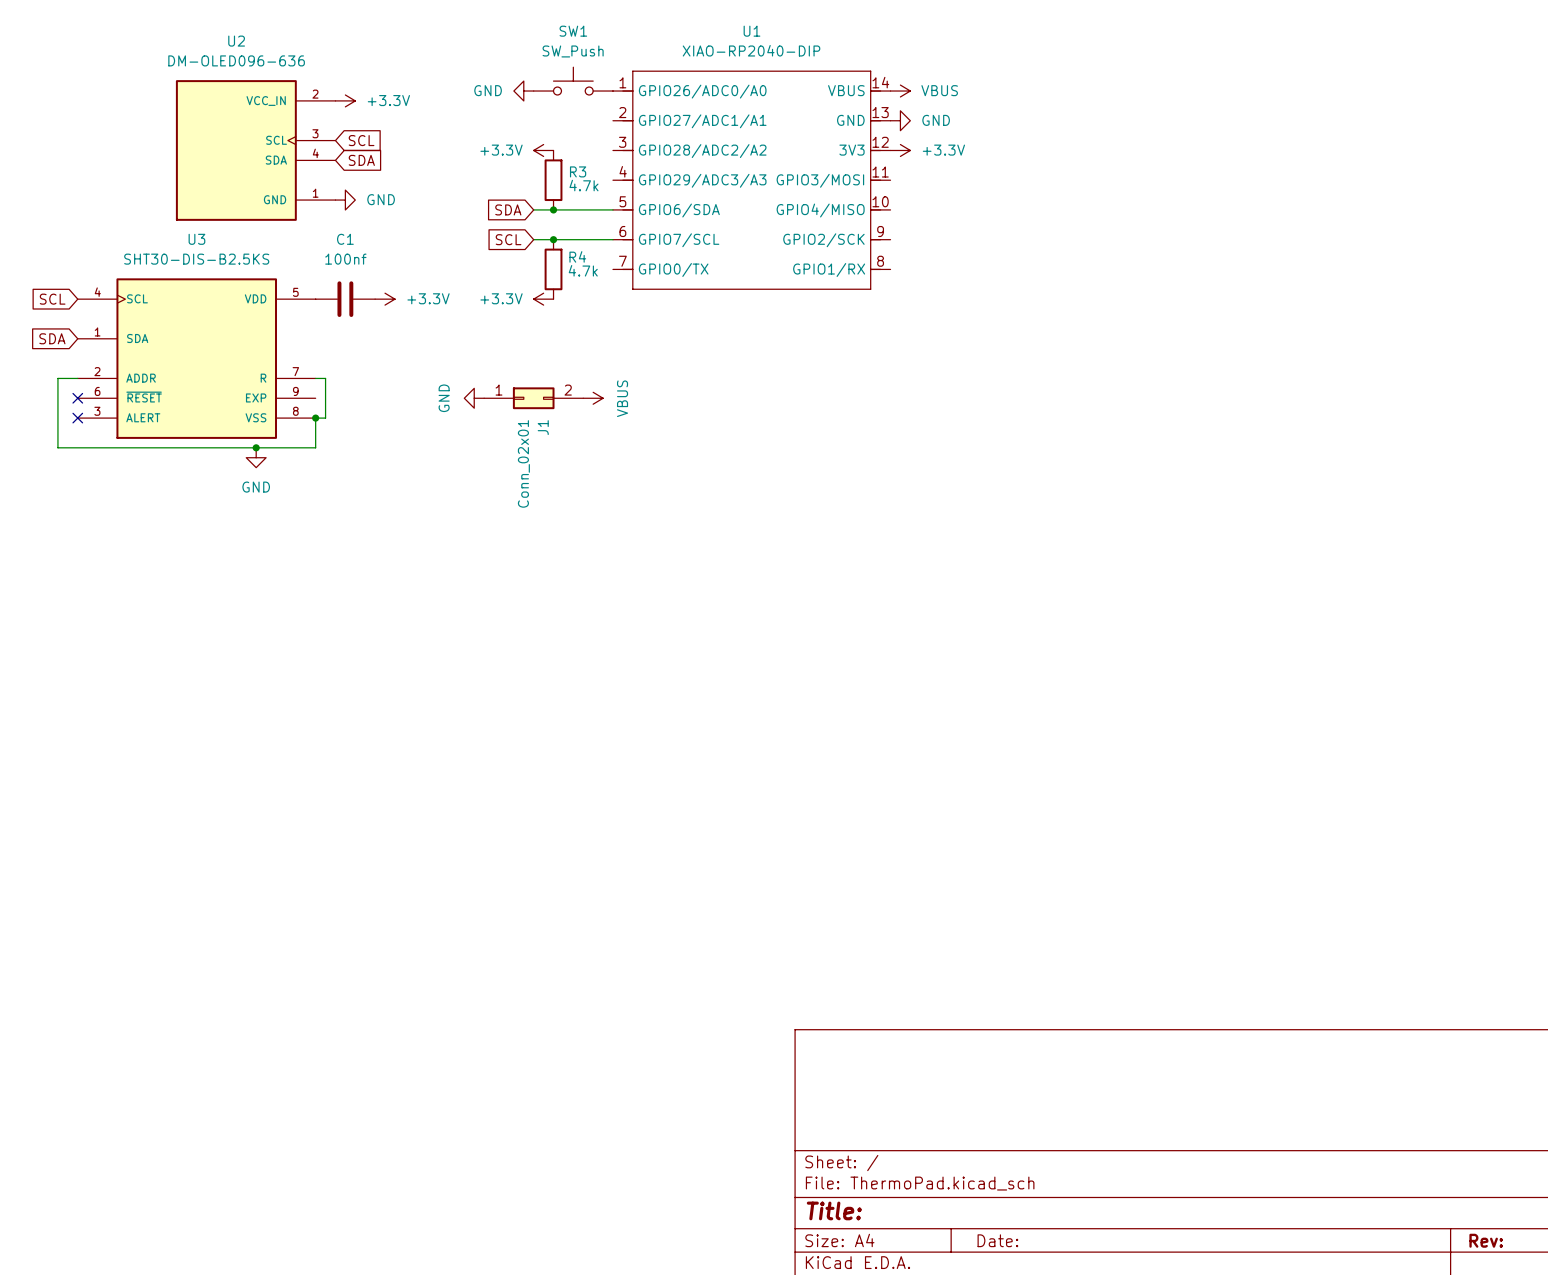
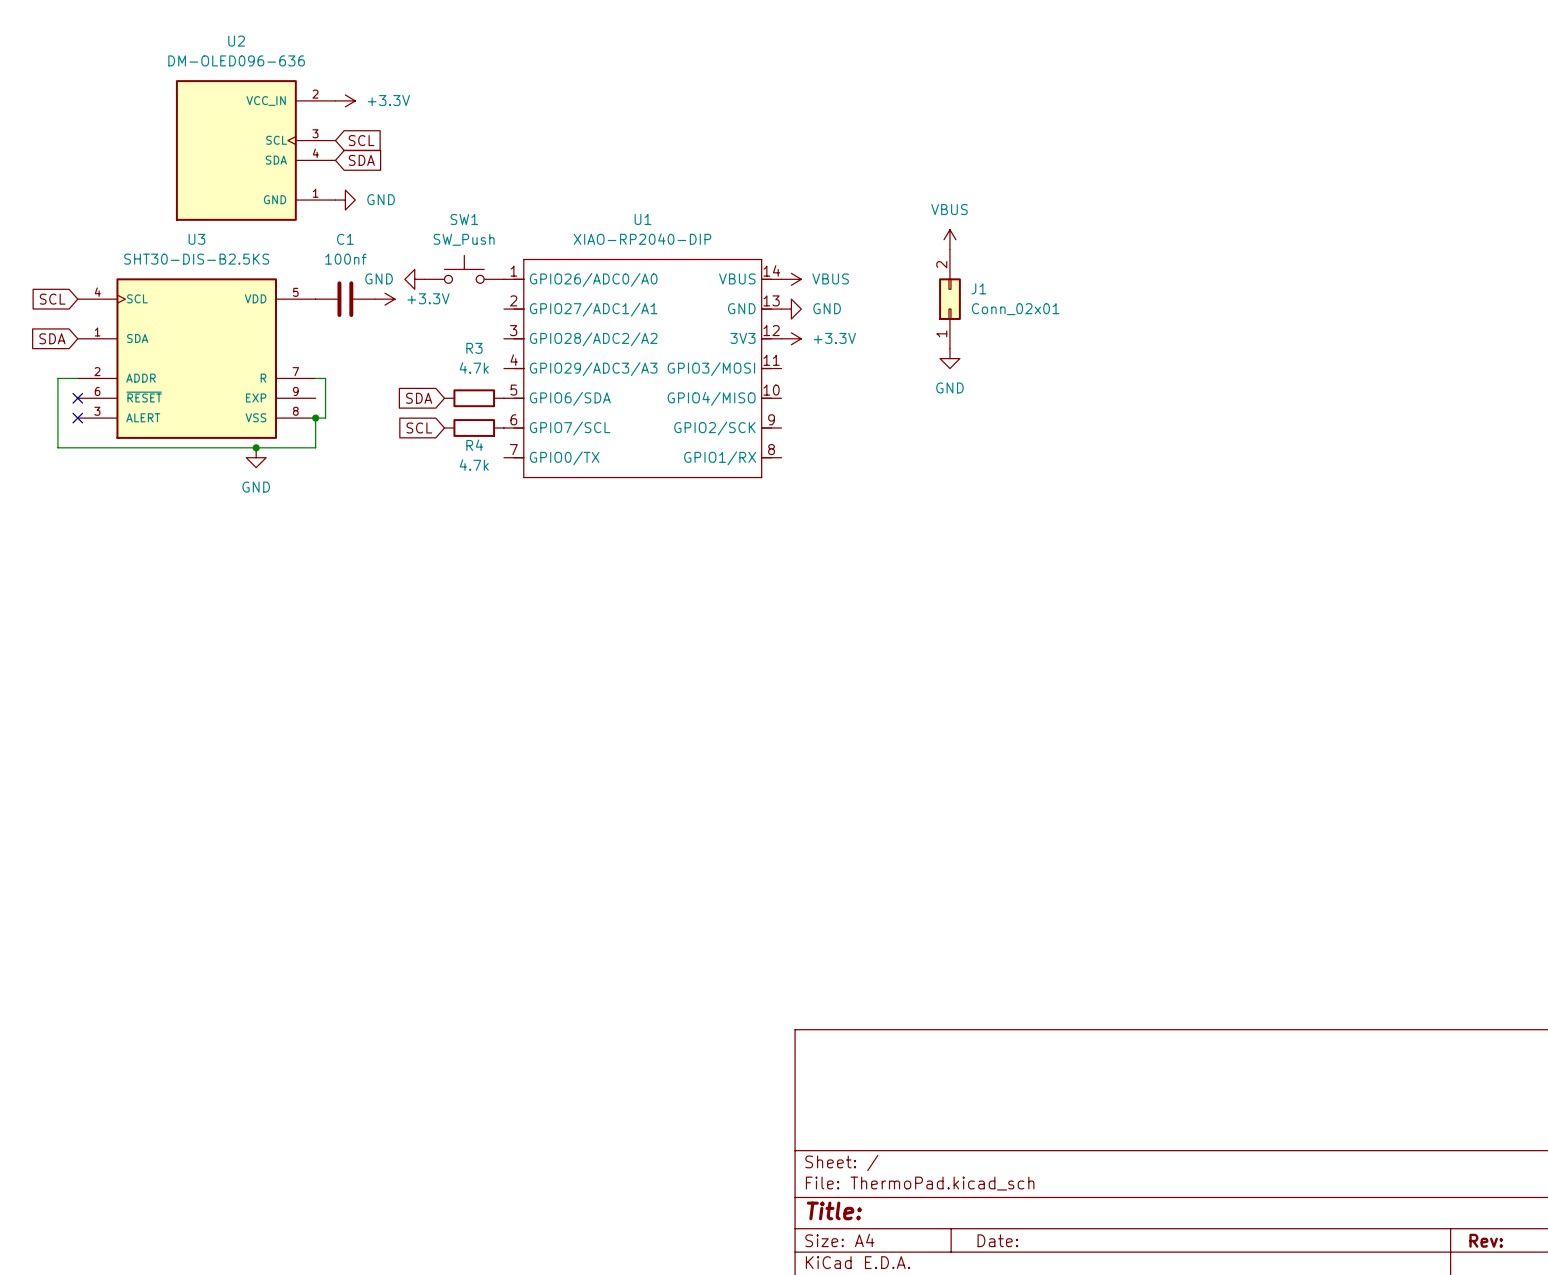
SW1 position: (573, 81) -> (464, 269)
power symbol: GND (523, 91) -> none
power symbol: VBUS (900, 91) -> none
power symbol: GND (900, 120) -> none
power symbol: +3.3V (543, 150) -> none
power symbol: +3.3V (900, 150) -> none
R3 name position: R3 (578, 171) -> R3 (474, 348)
R3 rotation: 0° (553, 180) -> 90° clockwise (474, 398)
R3 position: (553, 180) -> (474, 398)
U1 position: (751, 180) -> (642, 368)
R3 value position: 4.7k (583, 185) -> 4.7k (474, 367)
global label: SDA (508, 209) -> none
wire: (533, 209) (612, 209) -> none
junction: (553, 209) -> none
global label: SCL (508, 239) -> none
wire: (533, 239) (612, 239) -> none
junction: (553, 239) -> none
power symbol: none -> VBUS (949, 239)
R4 rotation: 0° (553, 269) -> 90° clockwise (474, 428)
R4 position: (553, 269) -> (474, 428)
power symbol: none -> GND (414, 279)
power symbol: none -> VBUS (791, 279)
power symbol: +3.3V (543, 299) -> none
power symbol: none -> GND (791, 309)
power symbol: none -> +3.3V (791, 338)
power symbol: none -> GND (949, 358)
global label: none -> SDA (419, 398)
power symbol: GND (474, 398) -> none
J1 rotation: 0° (533, 398) -> 90° counterclockwise (949, 299)
J1 position: (533, 398) -> (949, 299)
power symbol: VBUS (593, 398) -> none
global label: none -> SCL (419, 428)

